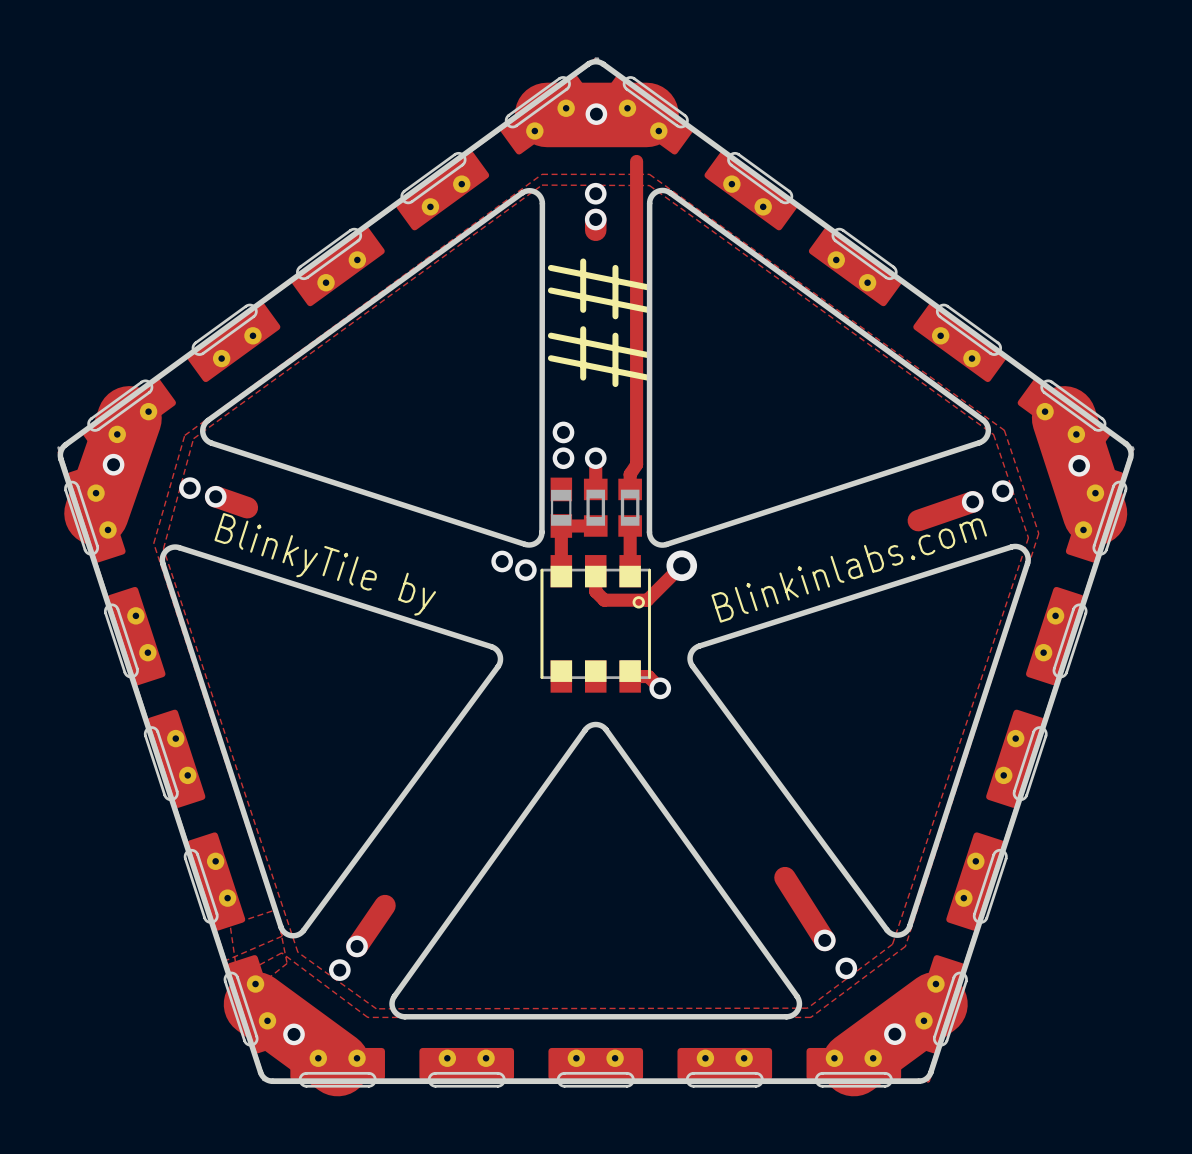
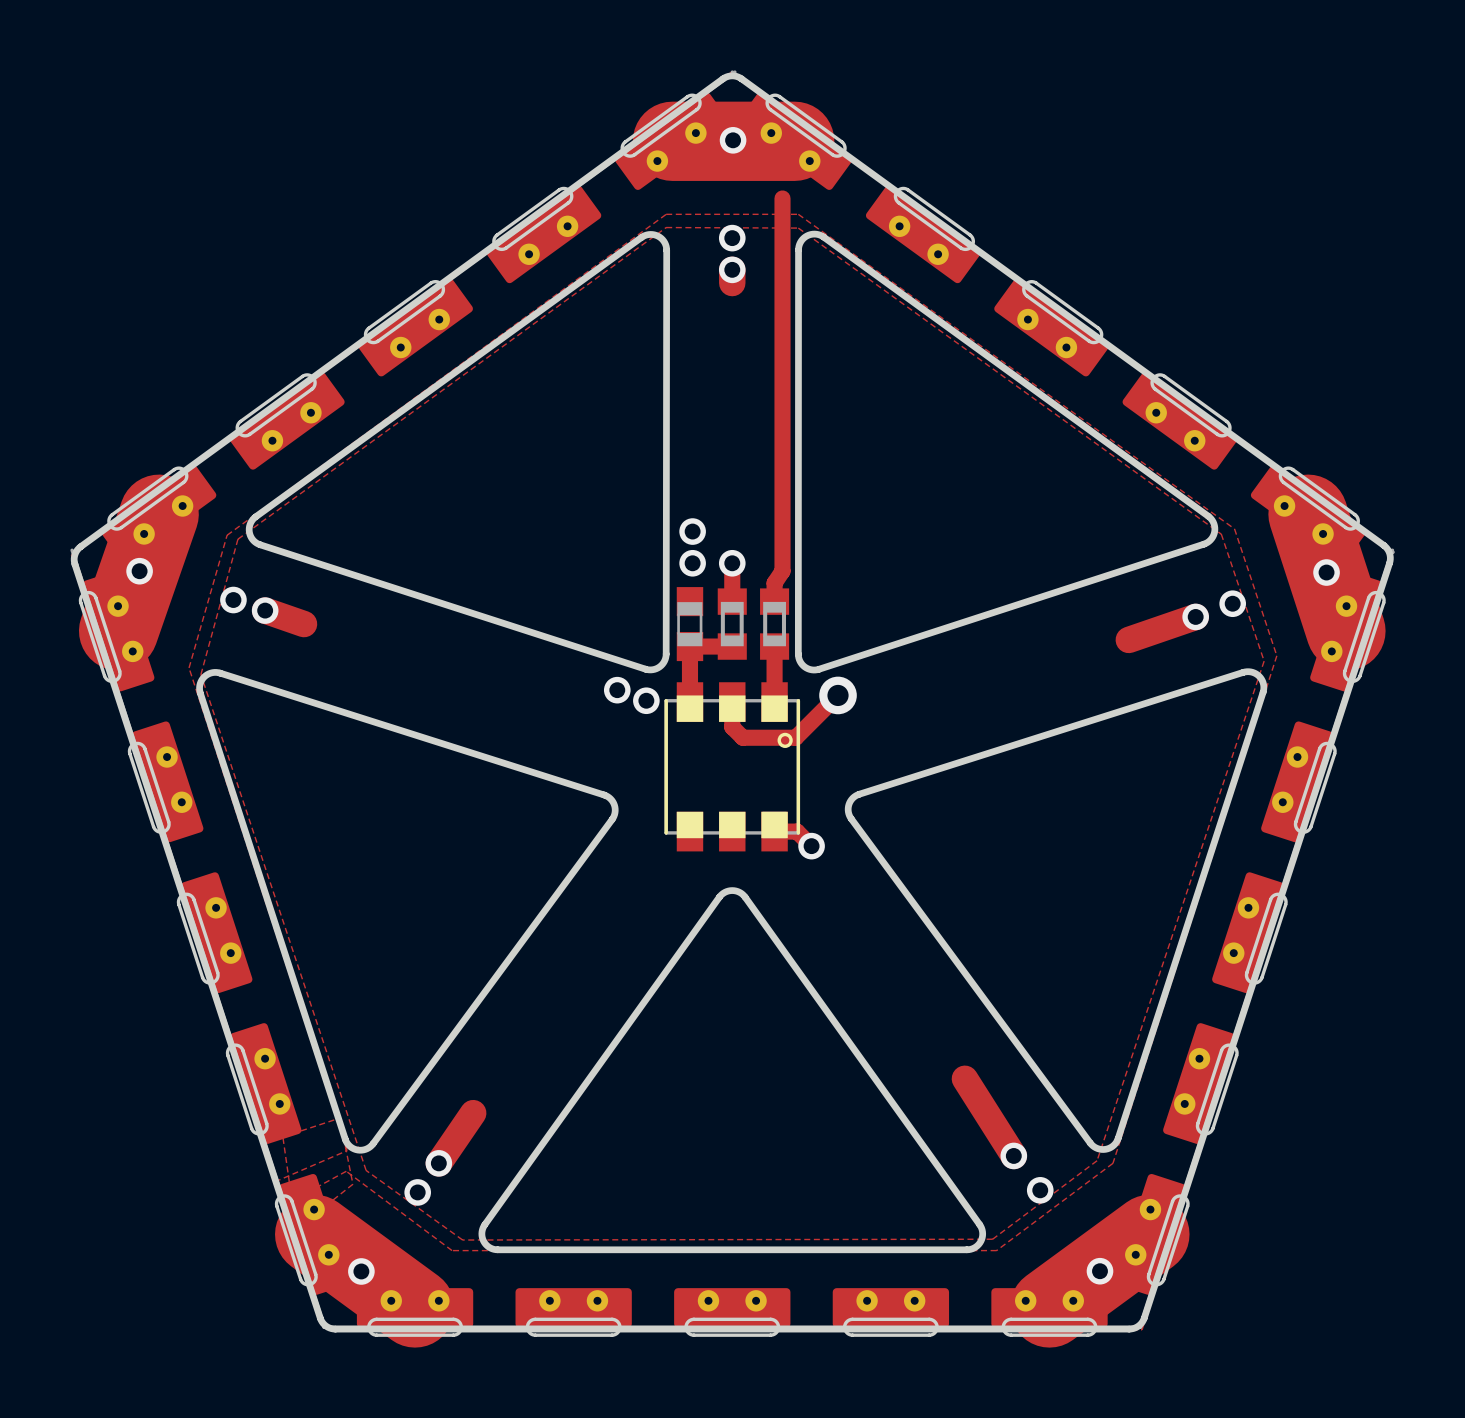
text: ## (599, 322) -> none
text: BlinkyTile by (325, 564) -> none
text: Blinkinlabs.com (849, 570) -> none

